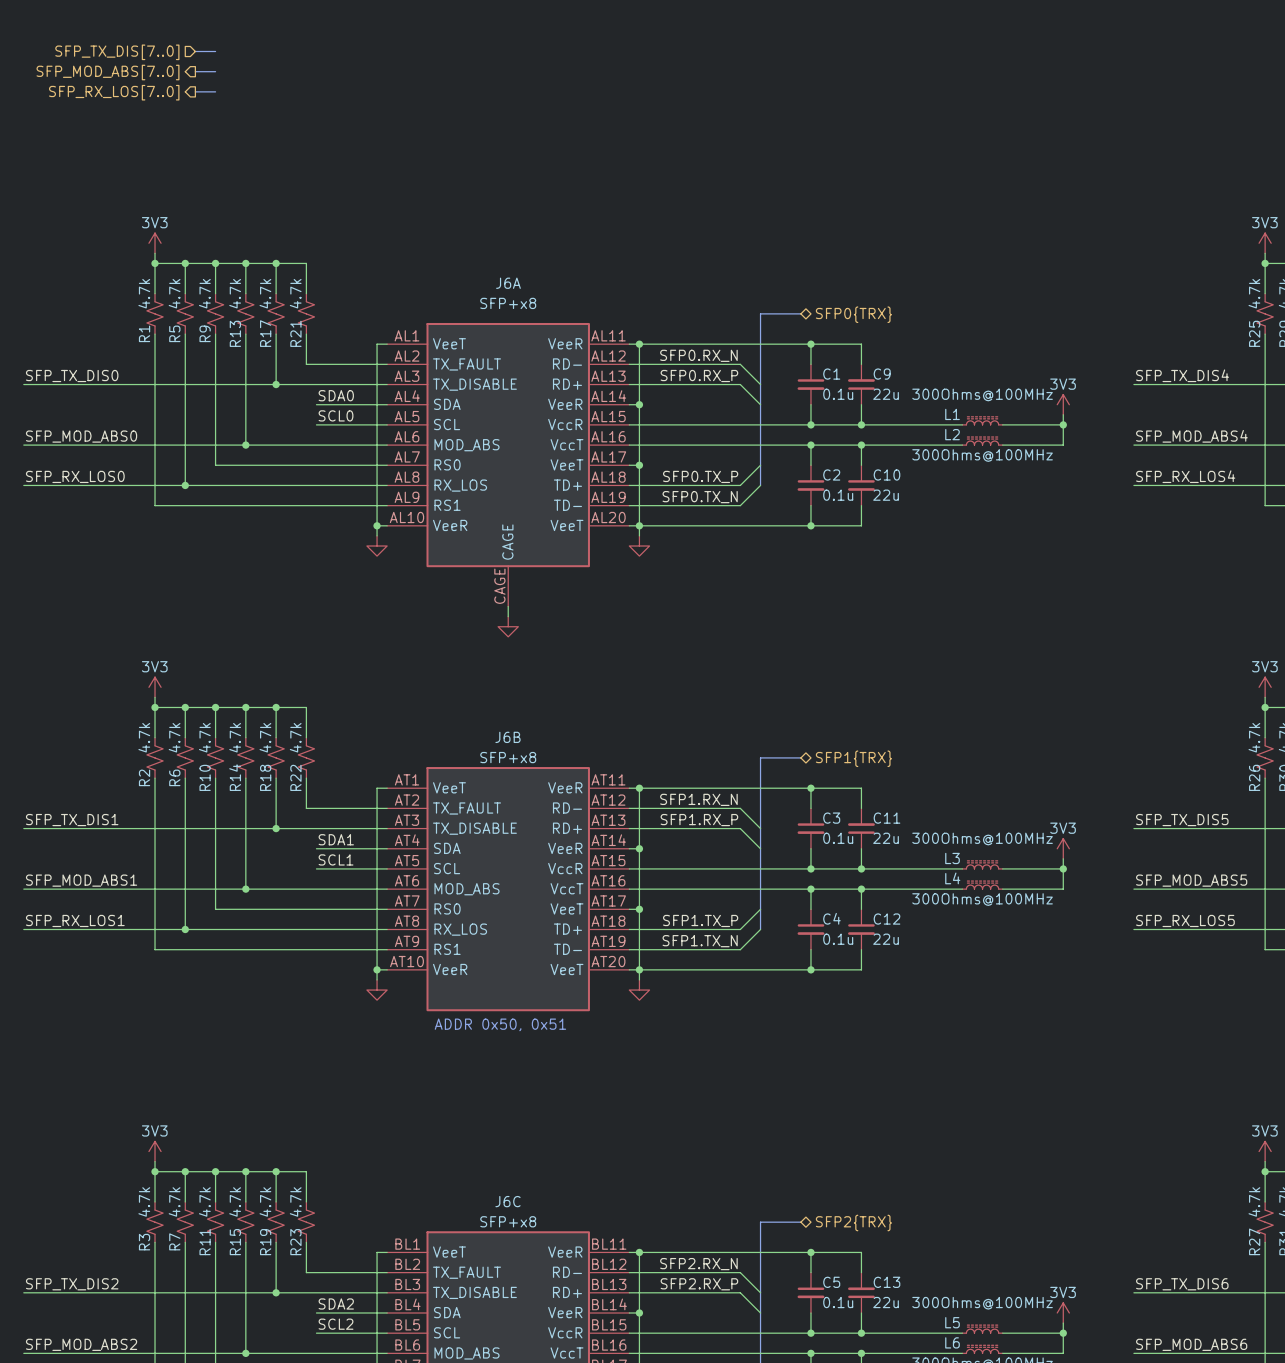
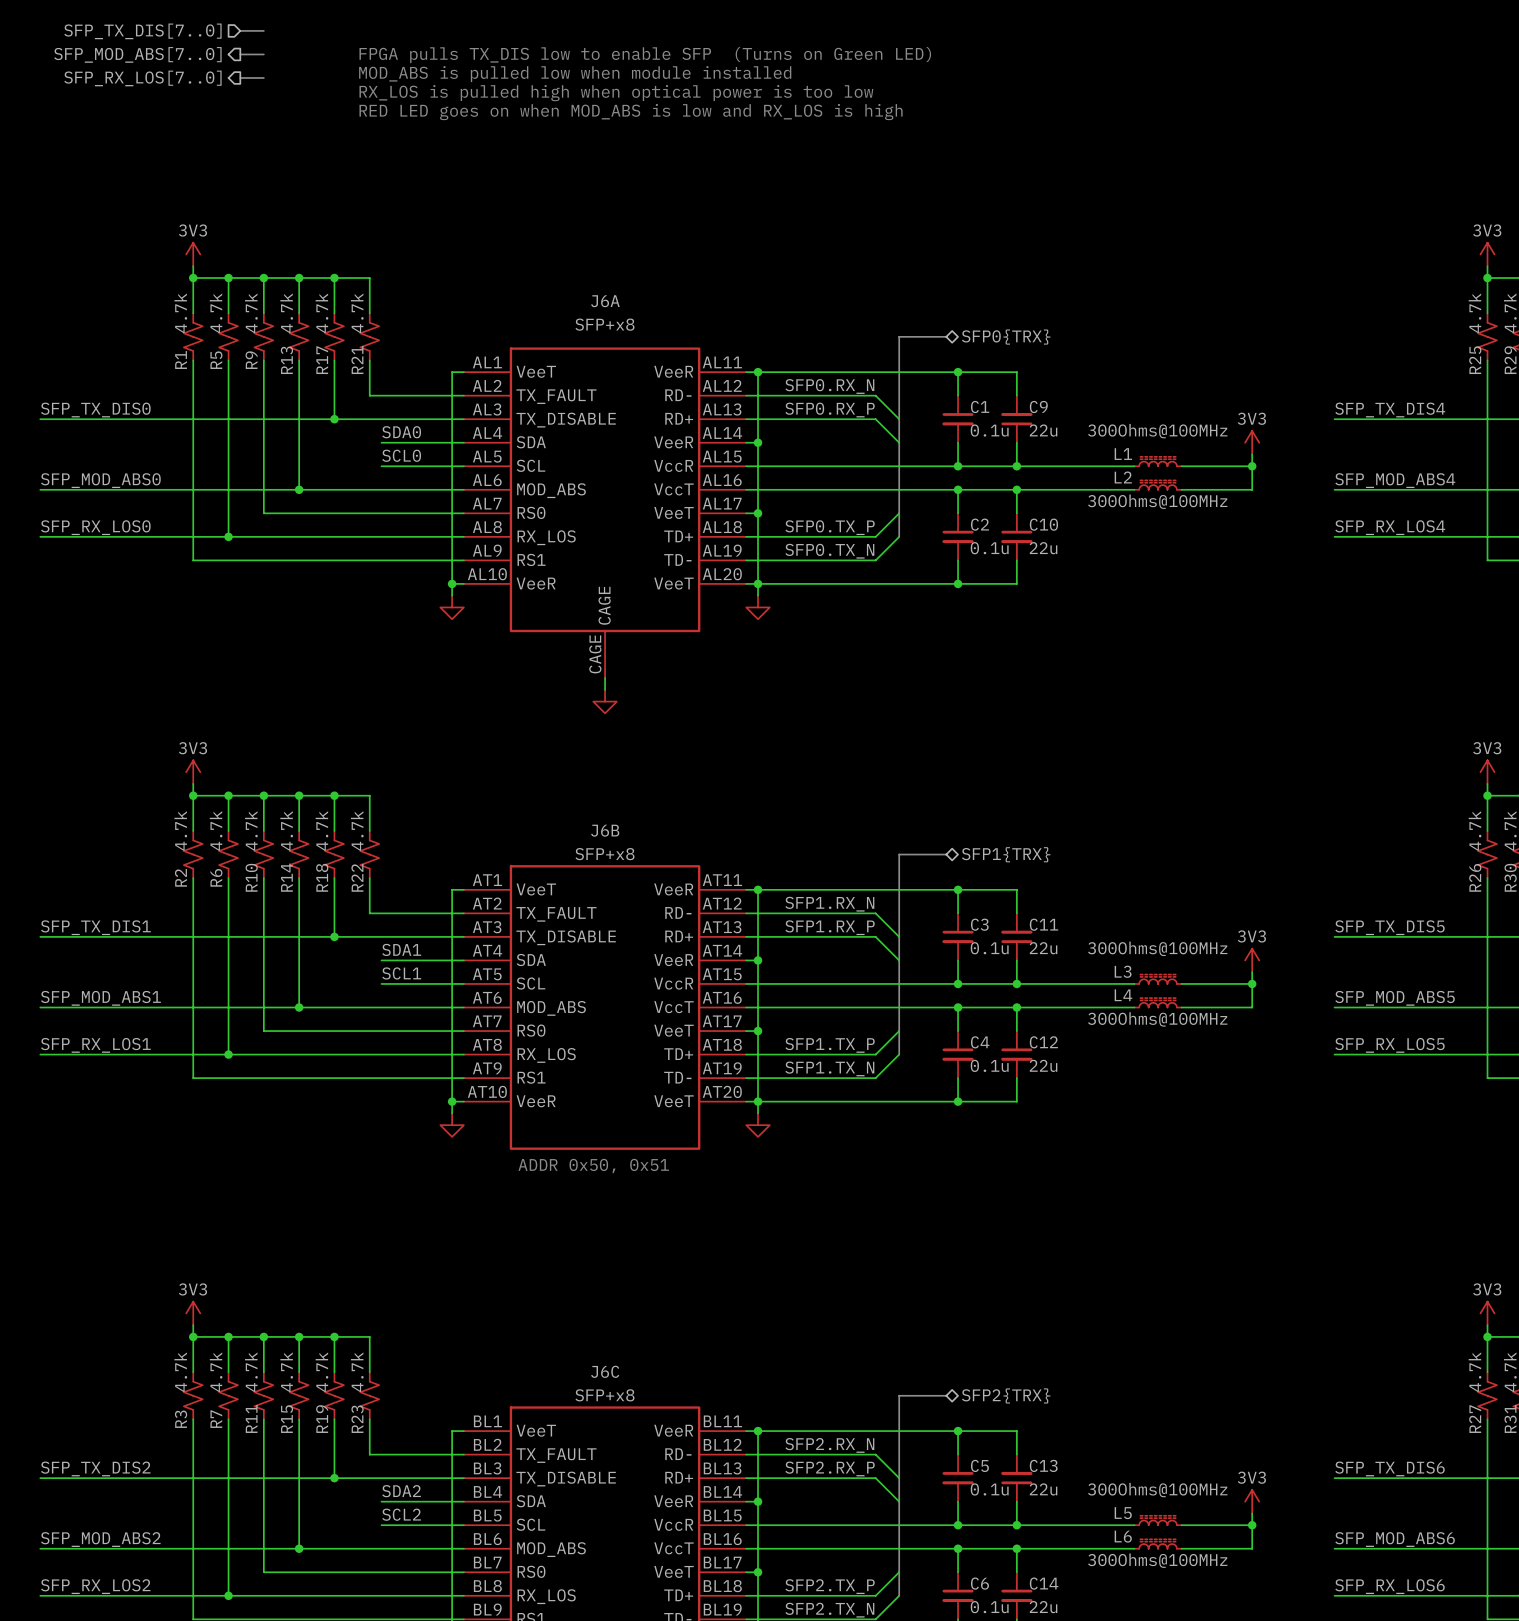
text: none -> FPGA pulls TX_DIS low to enable SFP (Turns on Green LED) (645, 55)
text: none -> MOD_ABS is pulled low when module installed (575, 74)
text: none -> RX_LOS is pulled high when optical power is too low (616, 93)
text: none -> RED LED goes on when MOD_ABS is low and RX_LOS is high (631, 112)

